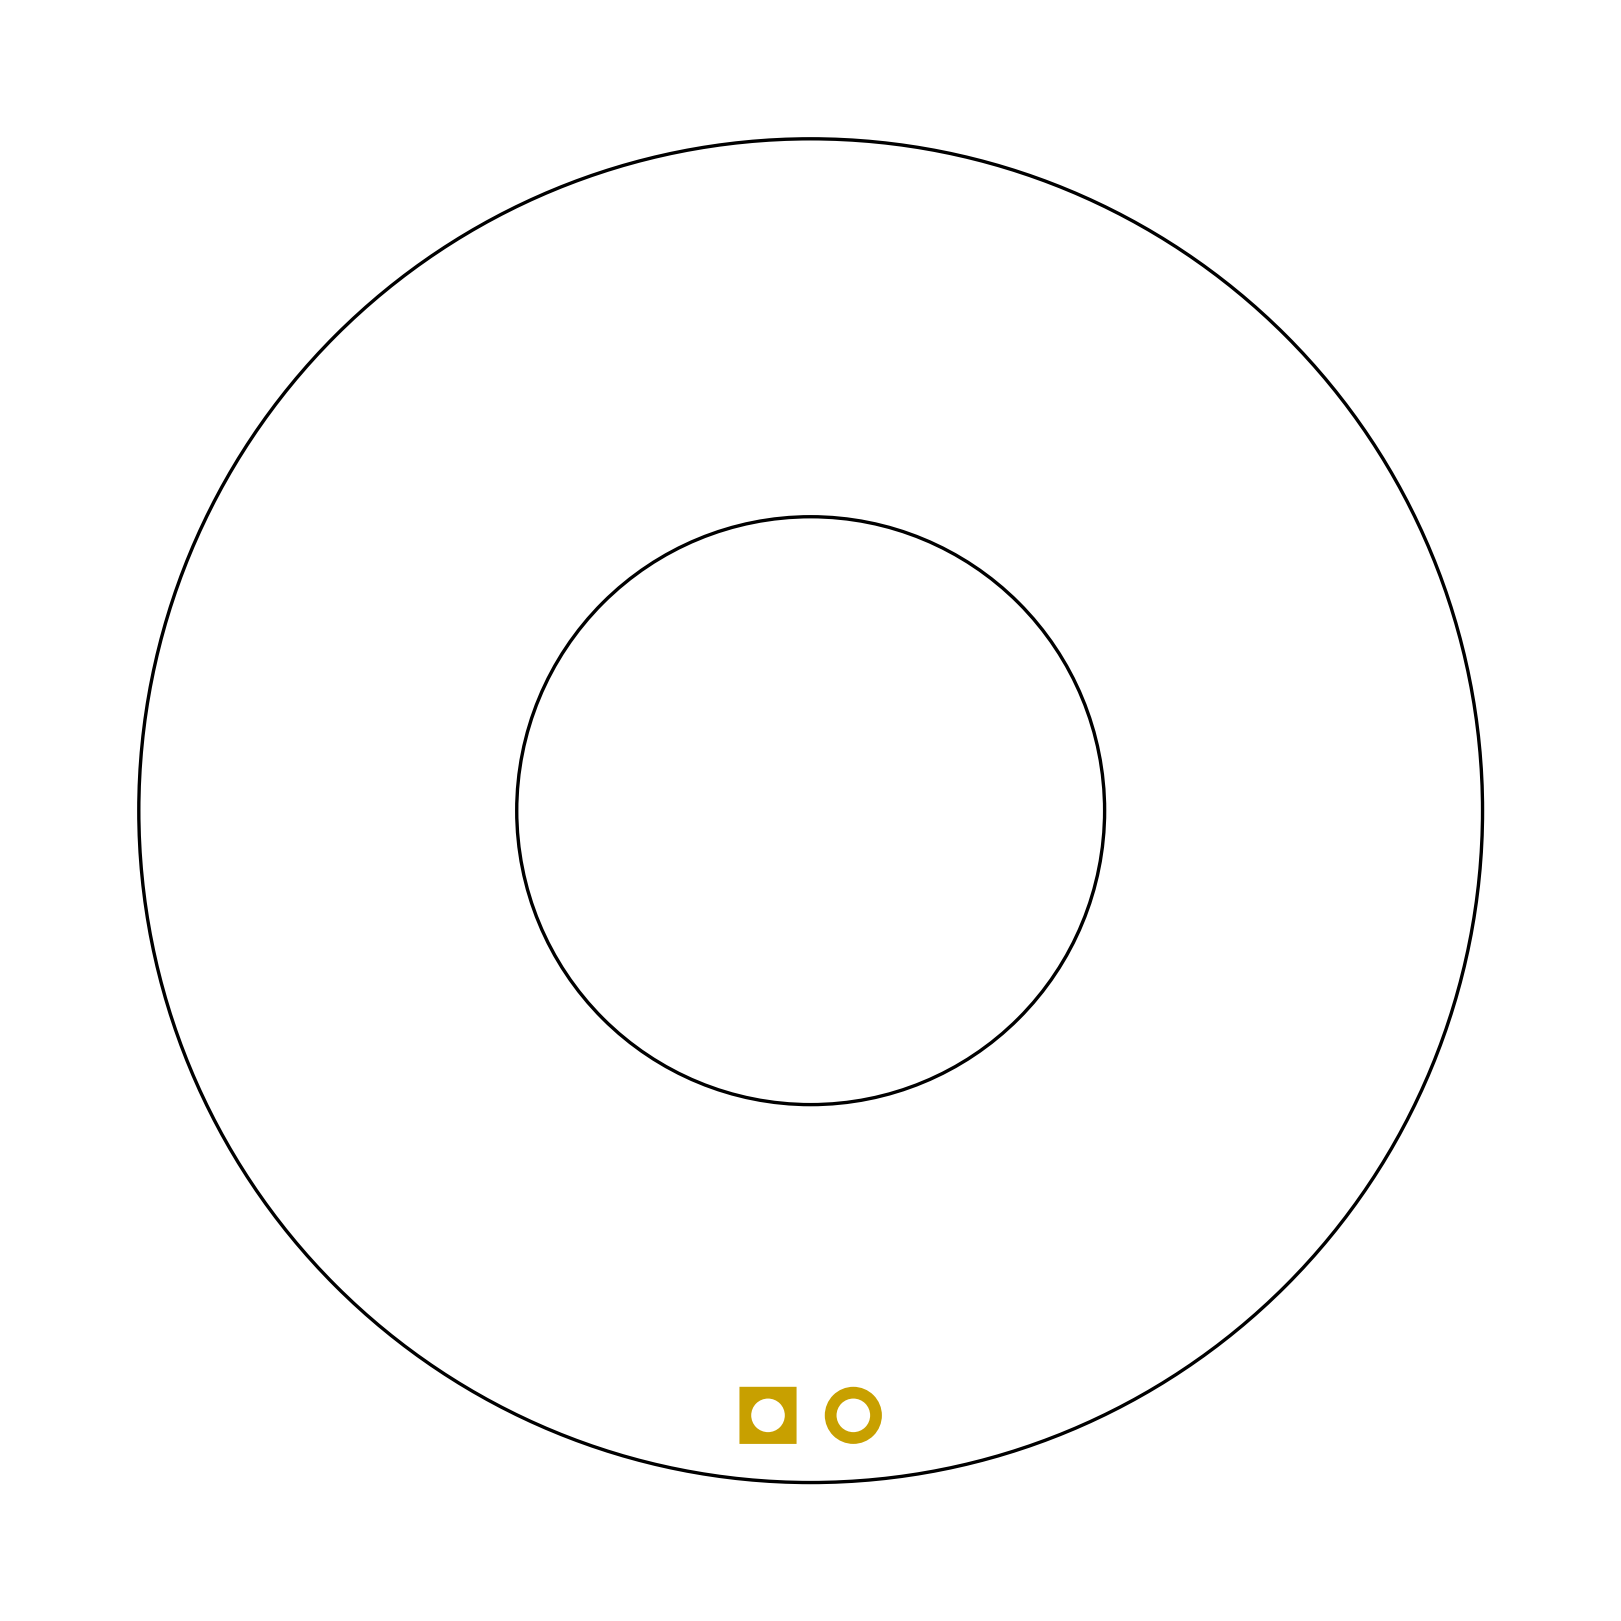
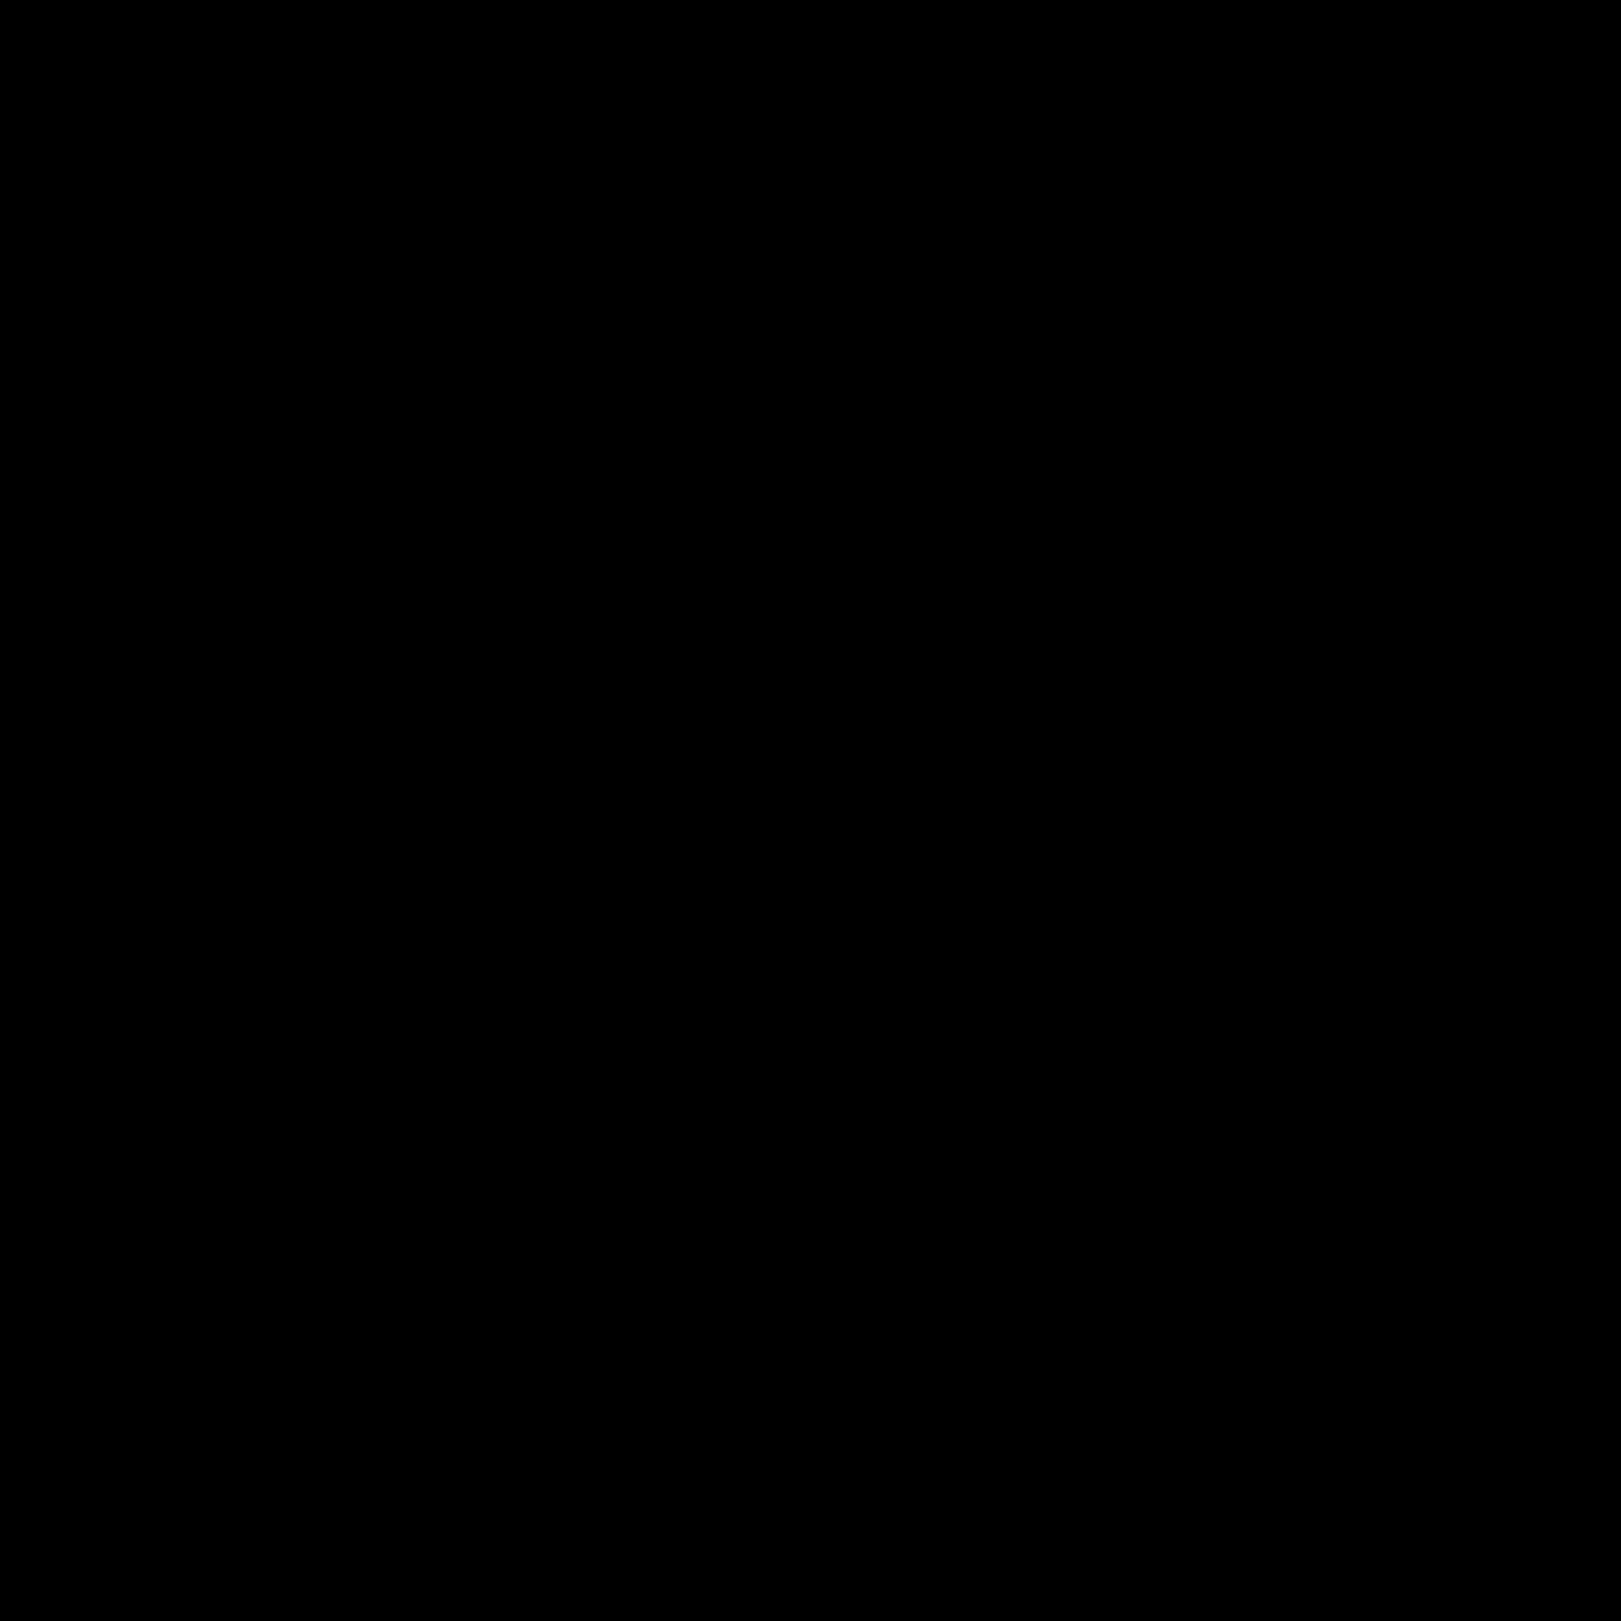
round board edge: [137, 137, 1485, 1485] -> none
round board edge: [515, 515, 1107, 1107] -> none
part: (810, 1415) -> none

